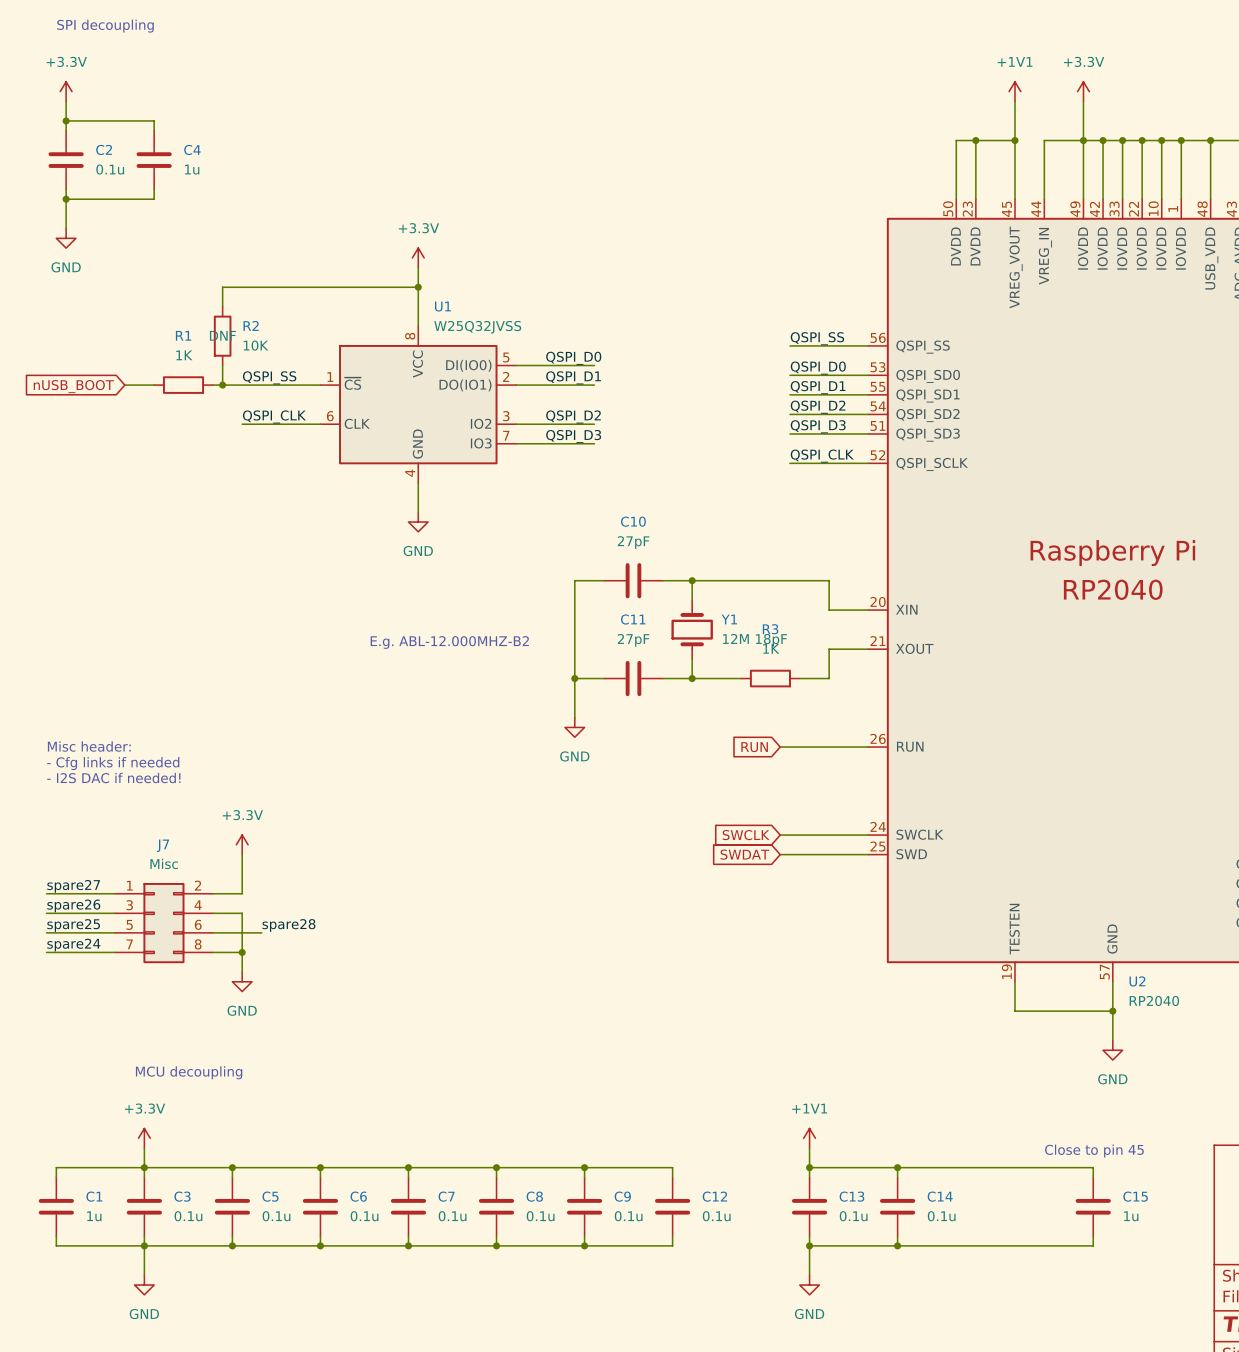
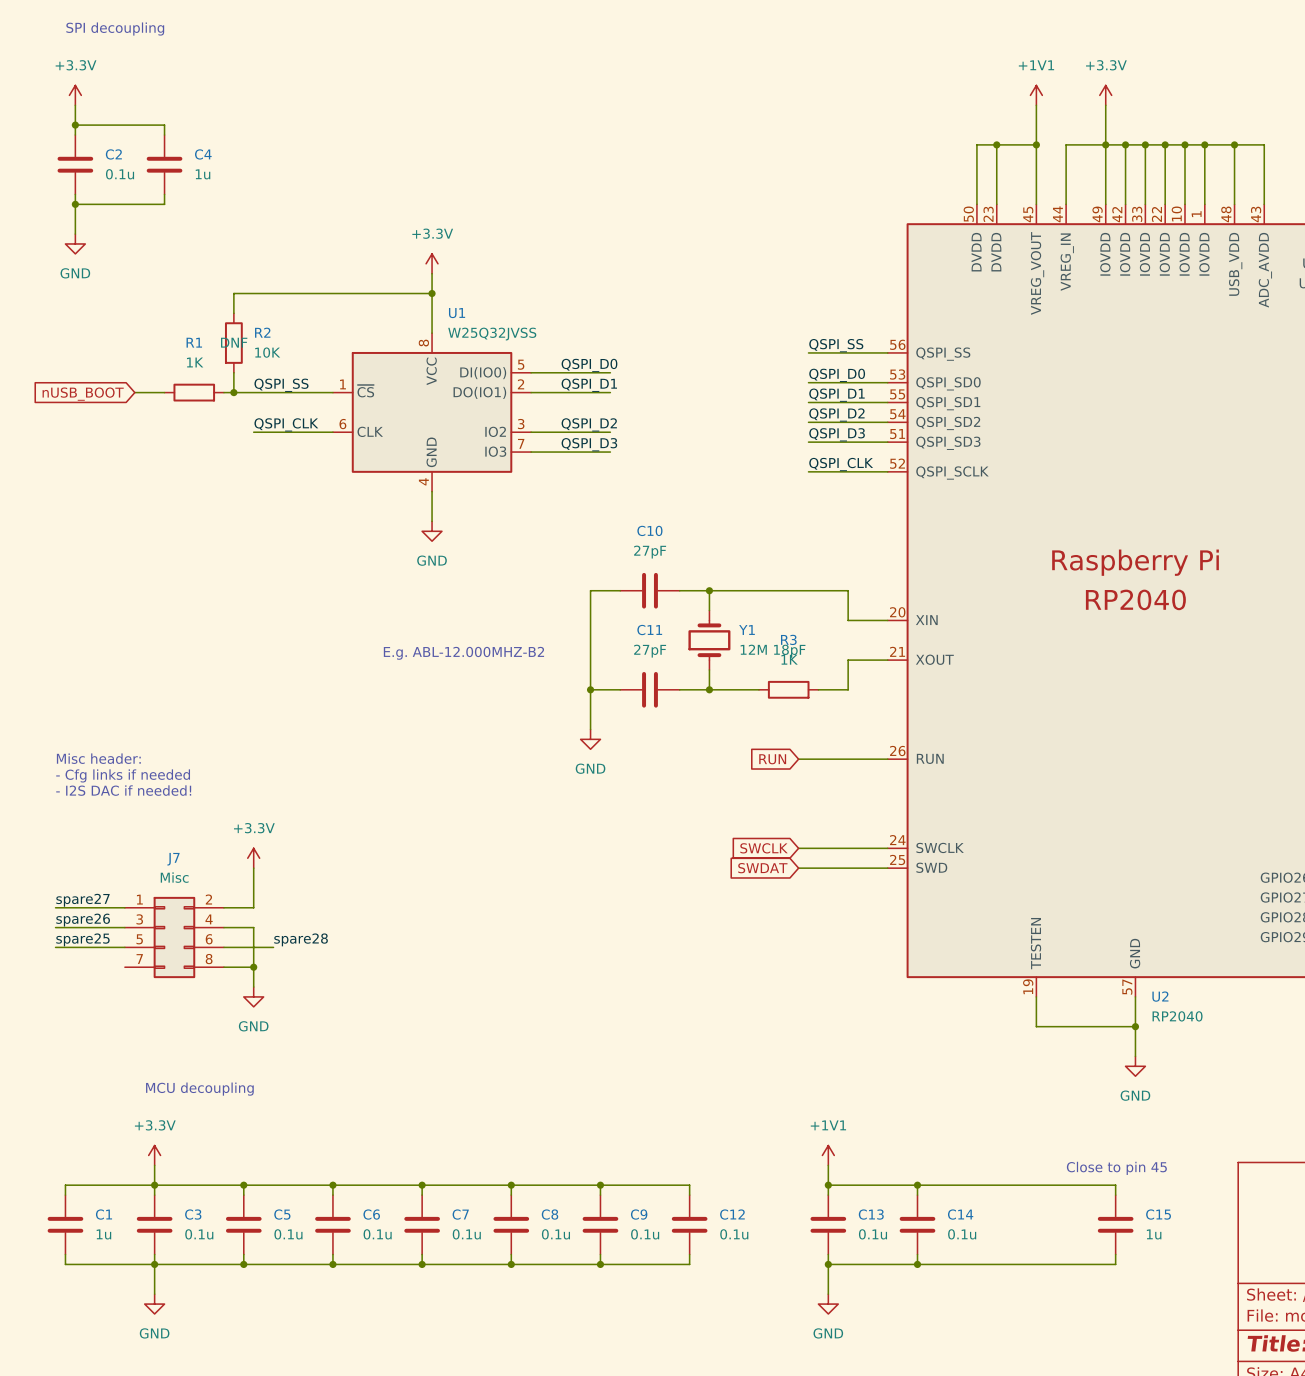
label: spare24 (73, 945) -> none
wire: (46, 952) (115, 952) -> none

